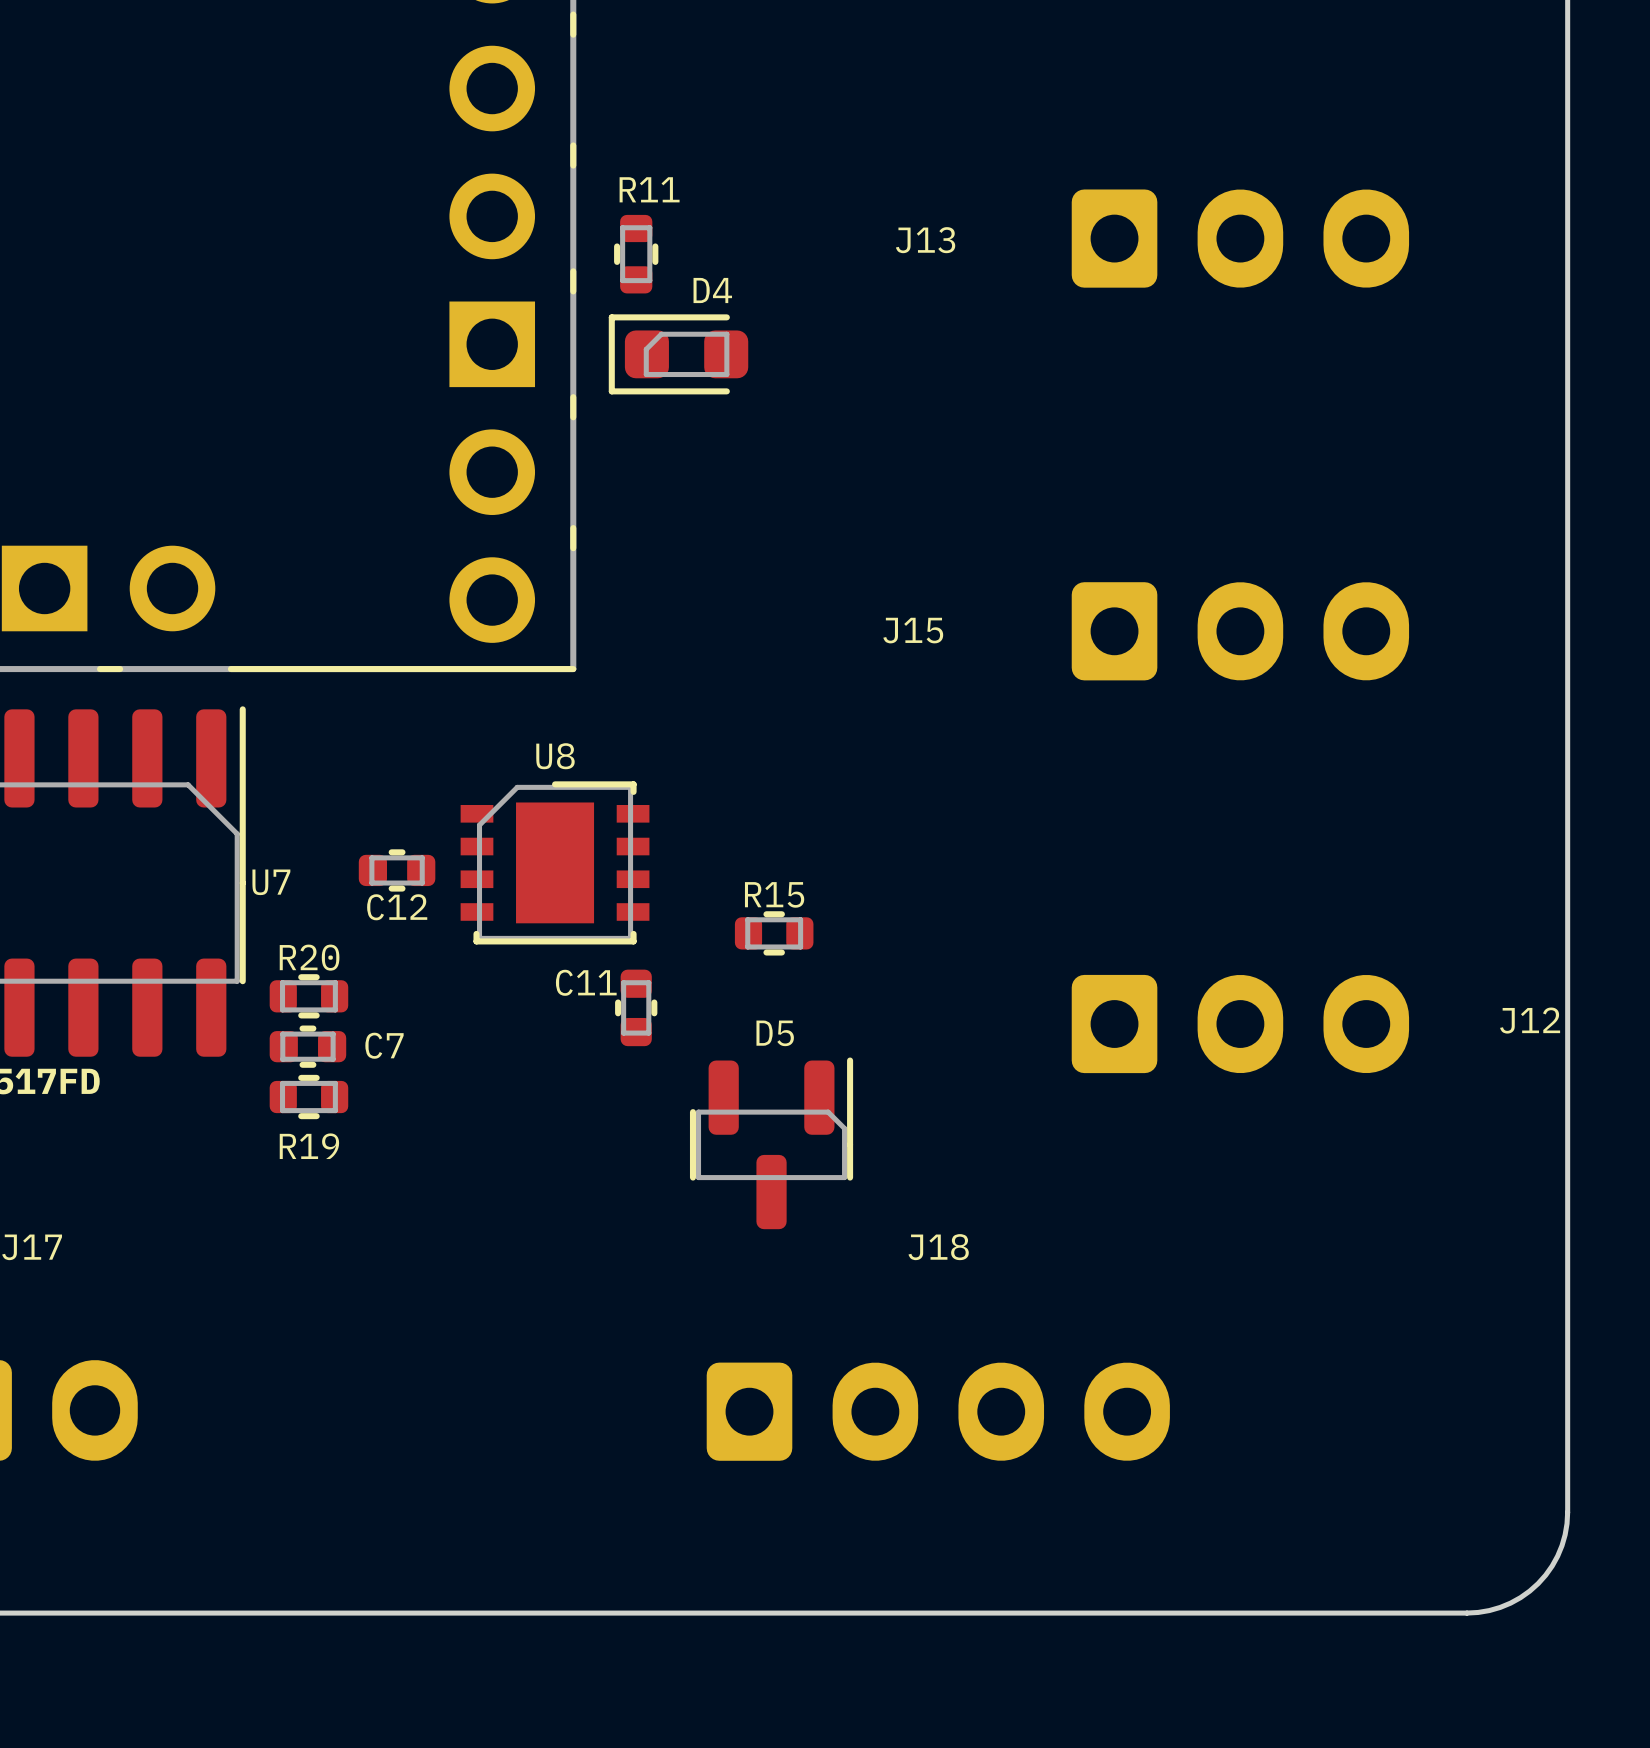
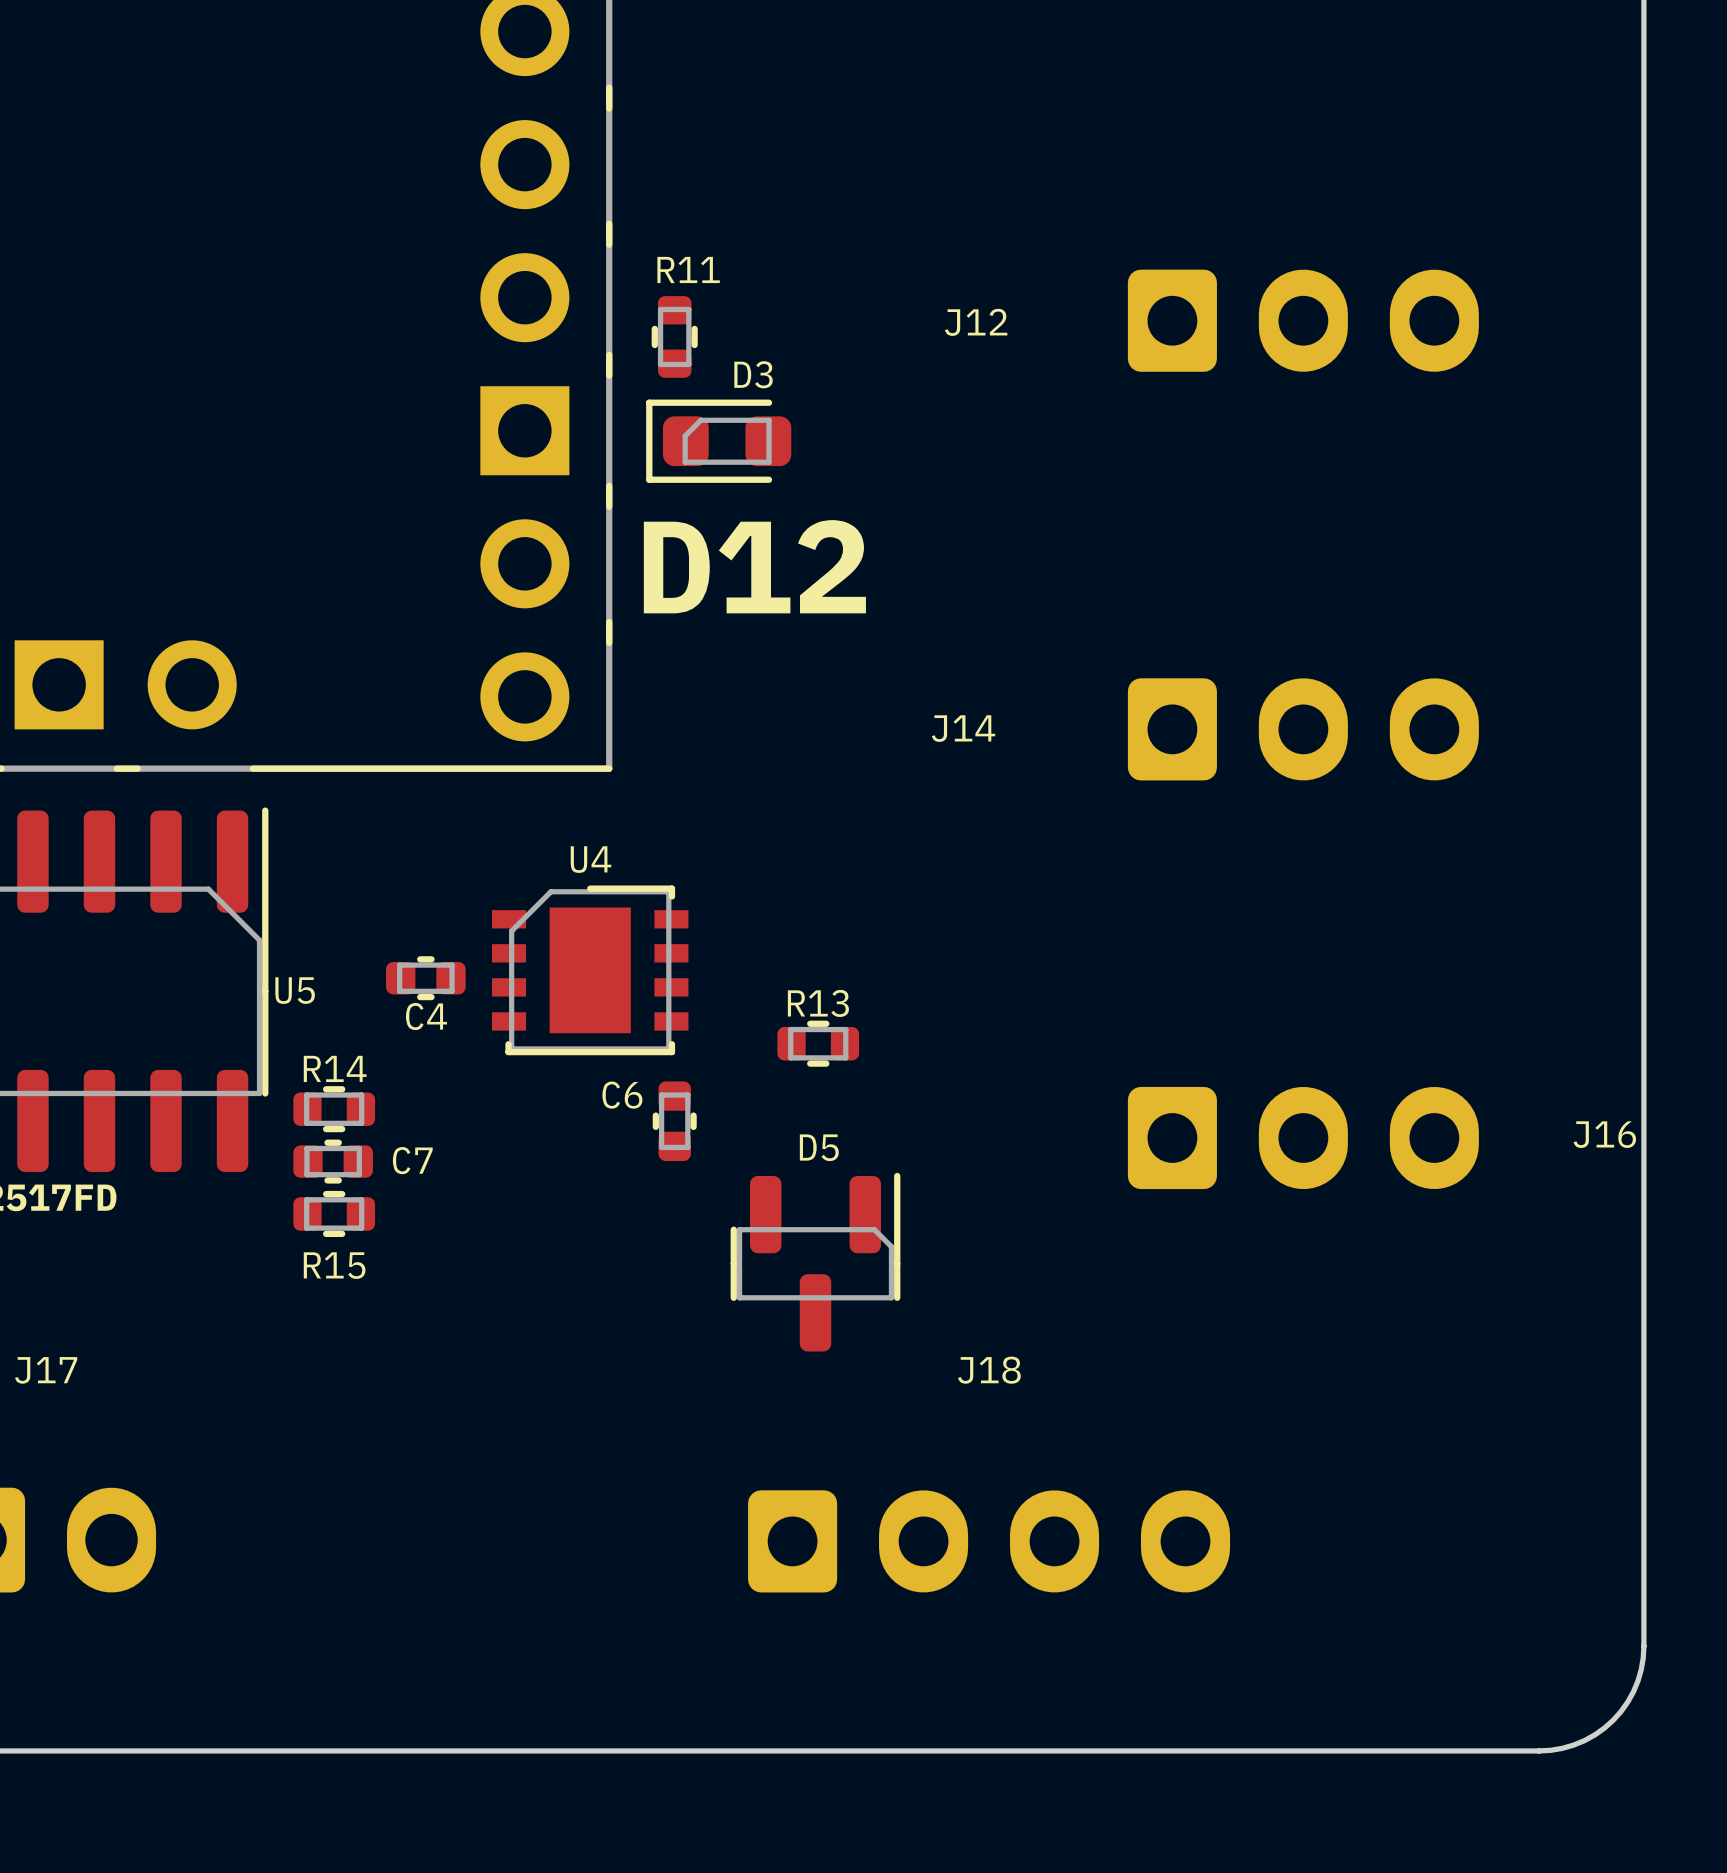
J13 name: J13 (925, 240) -> J12 (976, 322)
D4 name: D4 (712, 290) -> D3 (753, 374)
text: none -> D12 (754, 566)
J15 name: J15 (913, 630) -> J14 (963, 728)
U8 name: U8 (555, 756) -> U4 (591, 859)
U7 name: U7 (271, 882) -> U5 (295, 990)
R15 name: R15 (774, 894) -> R13 (818, 1003)
C12 name: C12 (397, 907) -> C4 (426, 1016)
R20 name: R20 (309, 957) -> R14 (335, 1068)
C11 name: C11 (586, 982) -> C6 (622, 1095)
J12 name: J12 (1530, 1020) -> J16 (1604, 1134)
R19 name: R19 (309, 1146) -> R15 (334, 1265)

